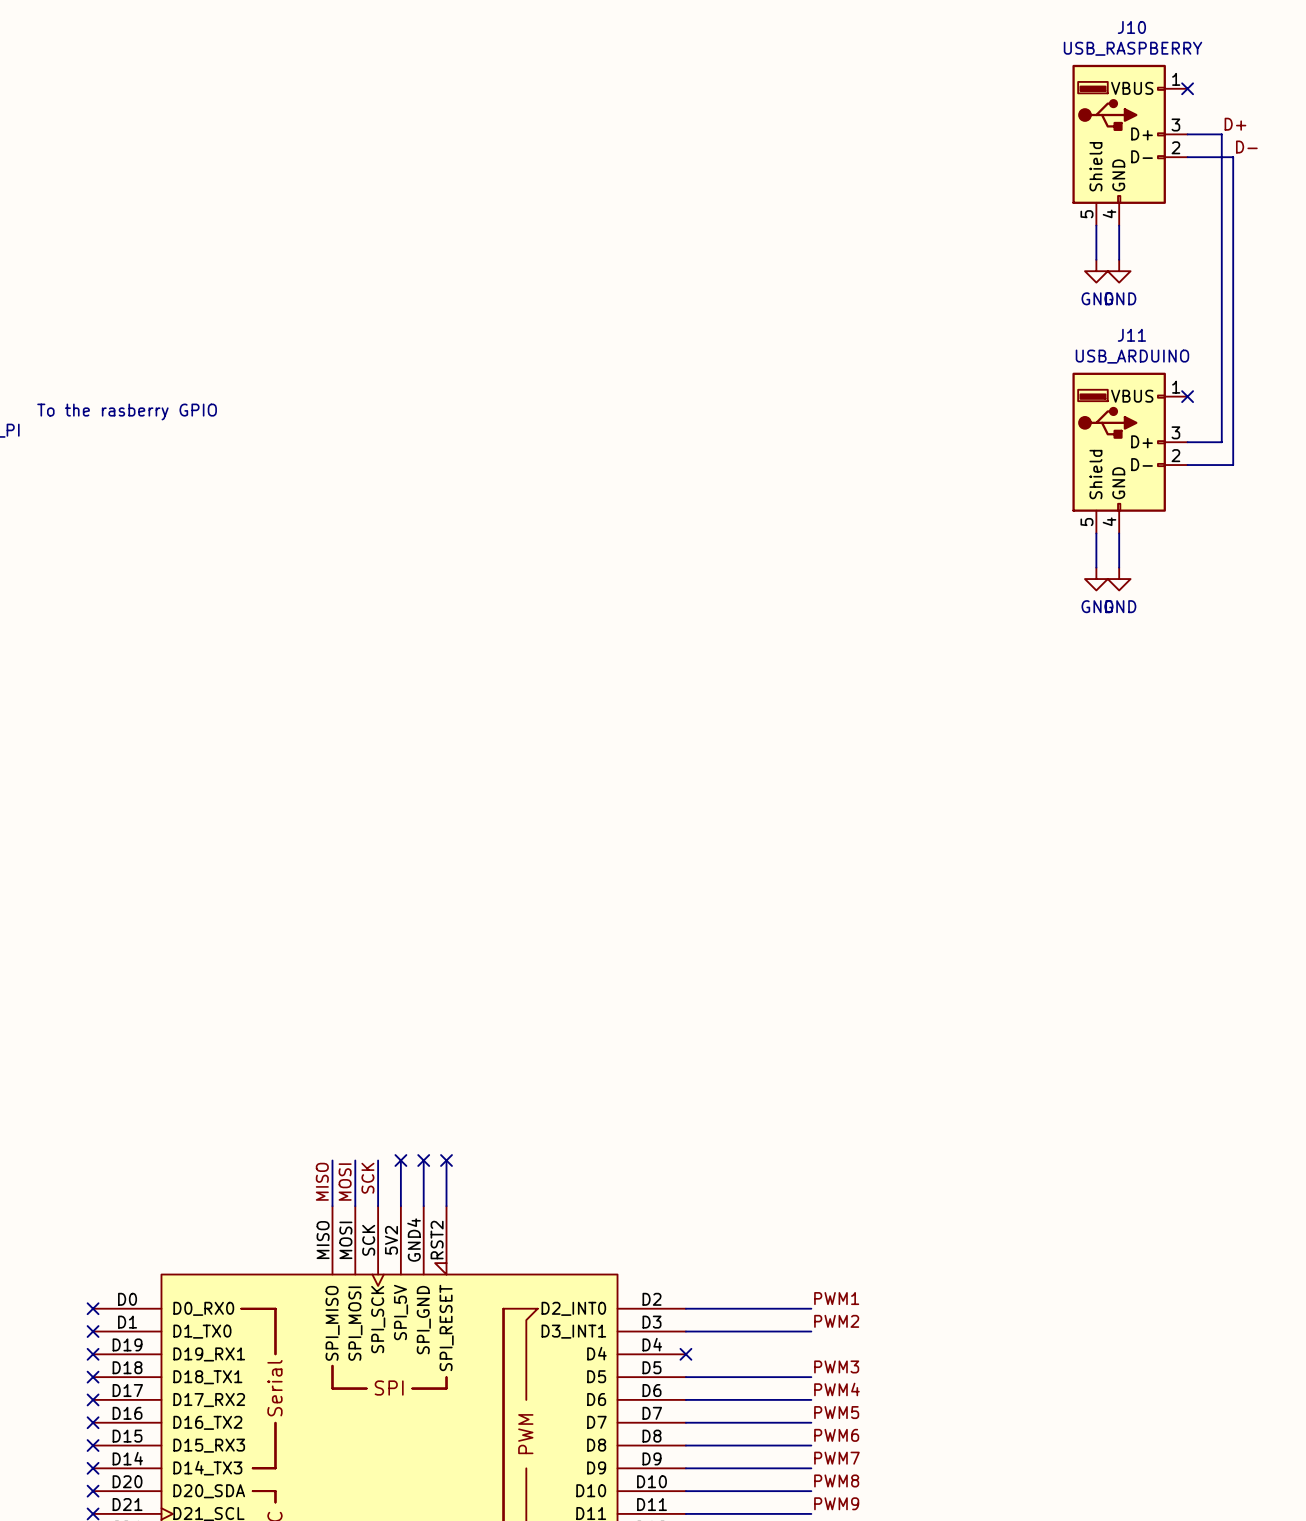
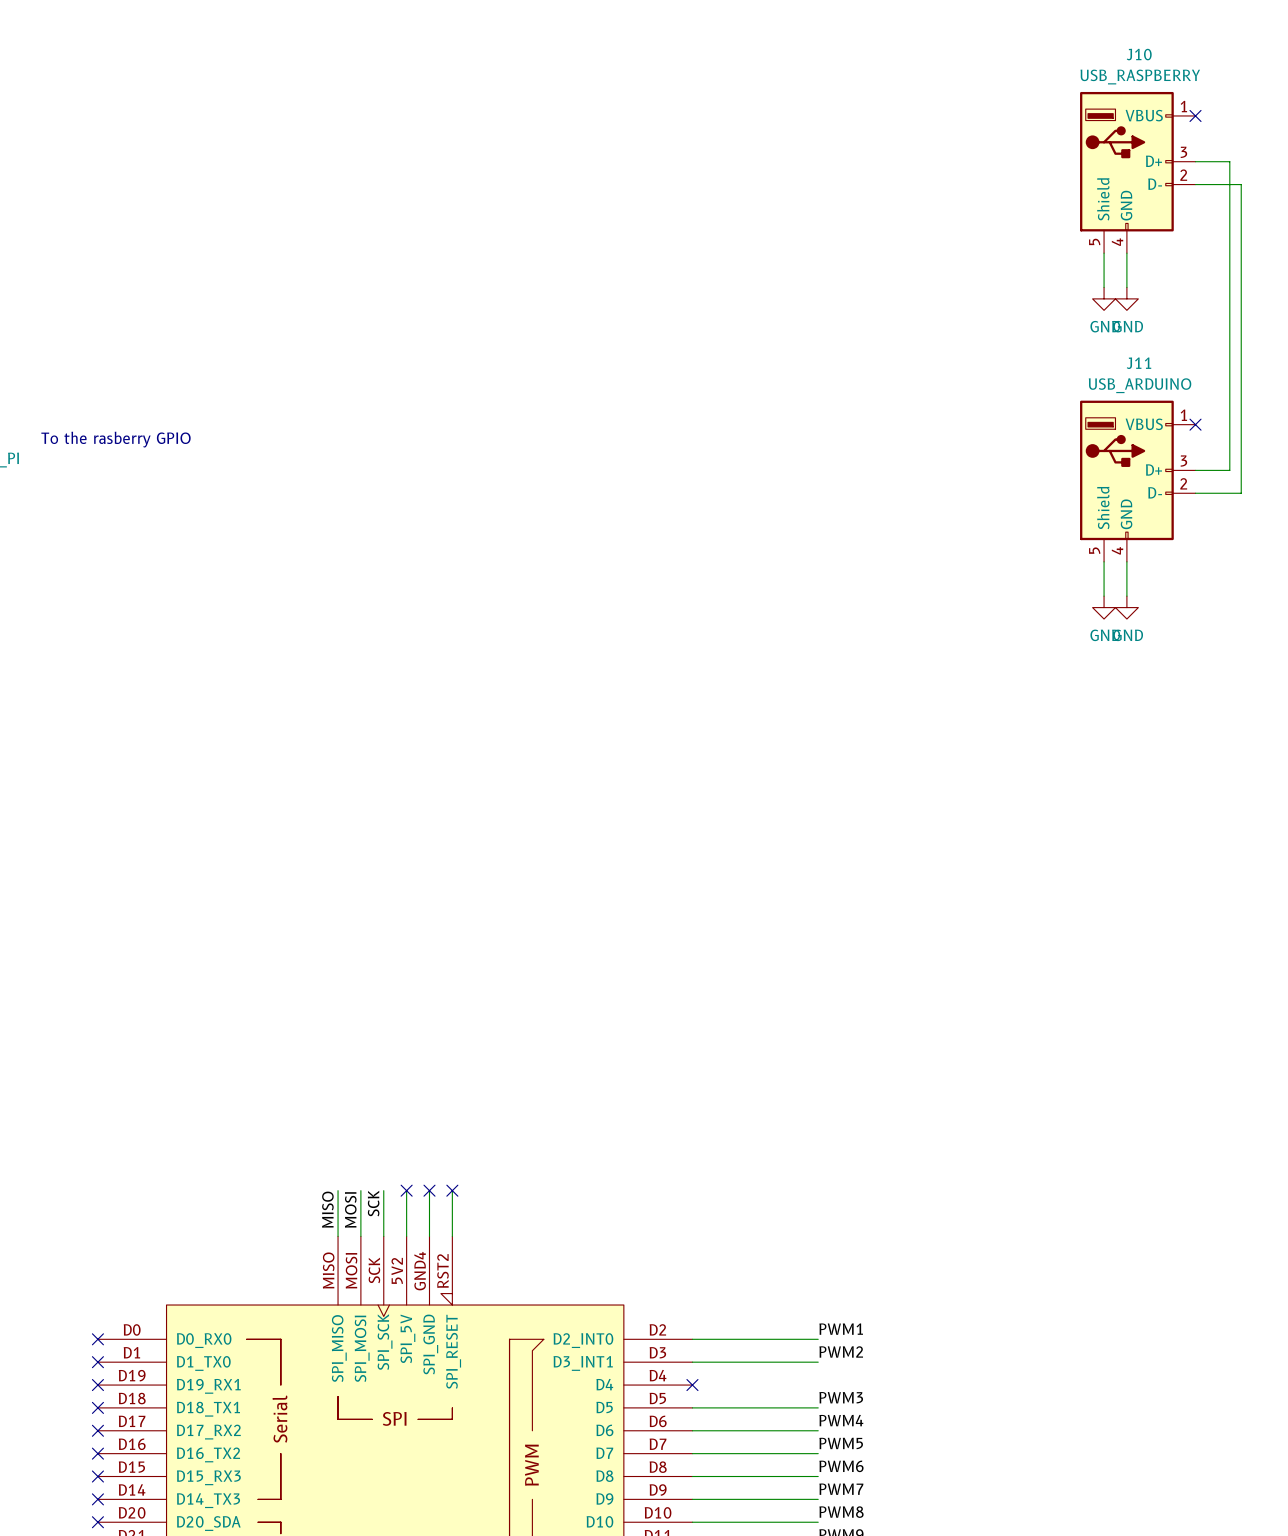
label: D+ (1235, 124) -> none
label: D- (1246, 147) -> none

